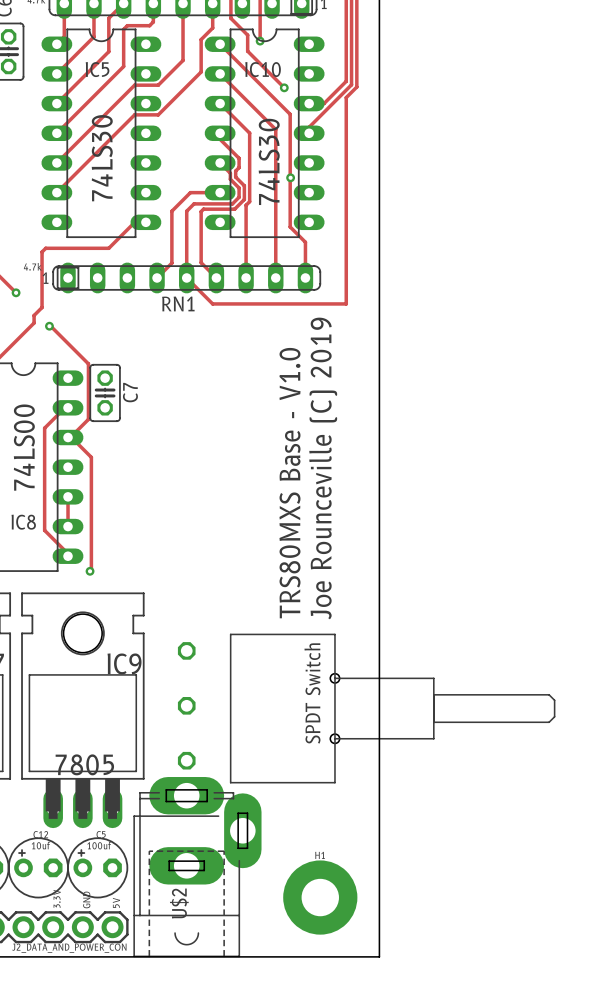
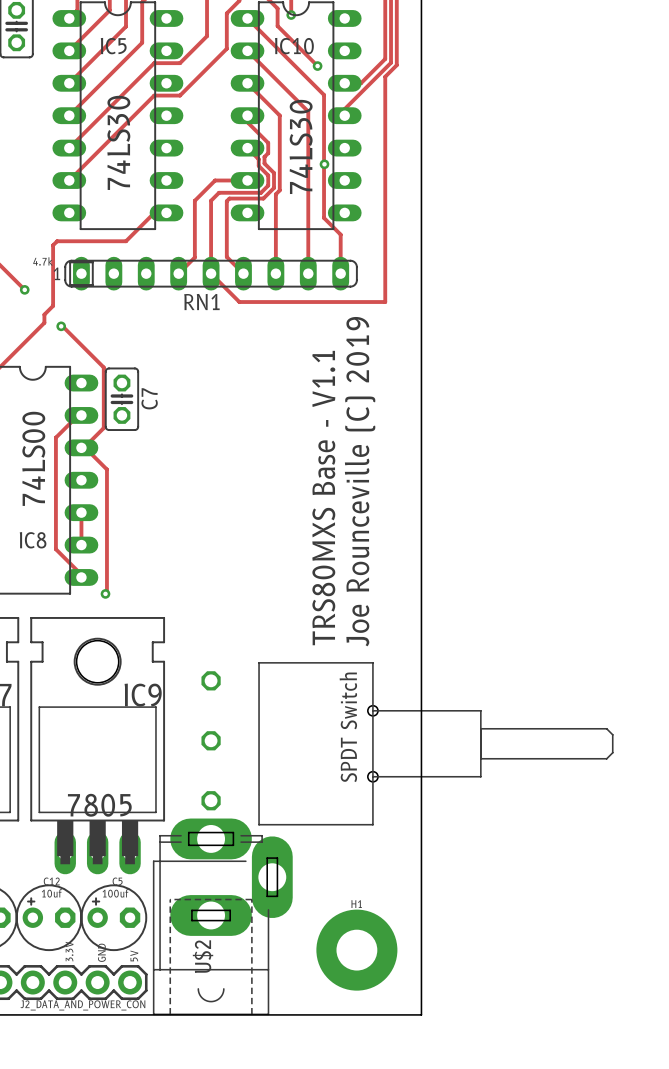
text: TRS80MXS Base - V1.0 (290, 483) -> TRS80MXS Base - V1.1 (323, 498)

